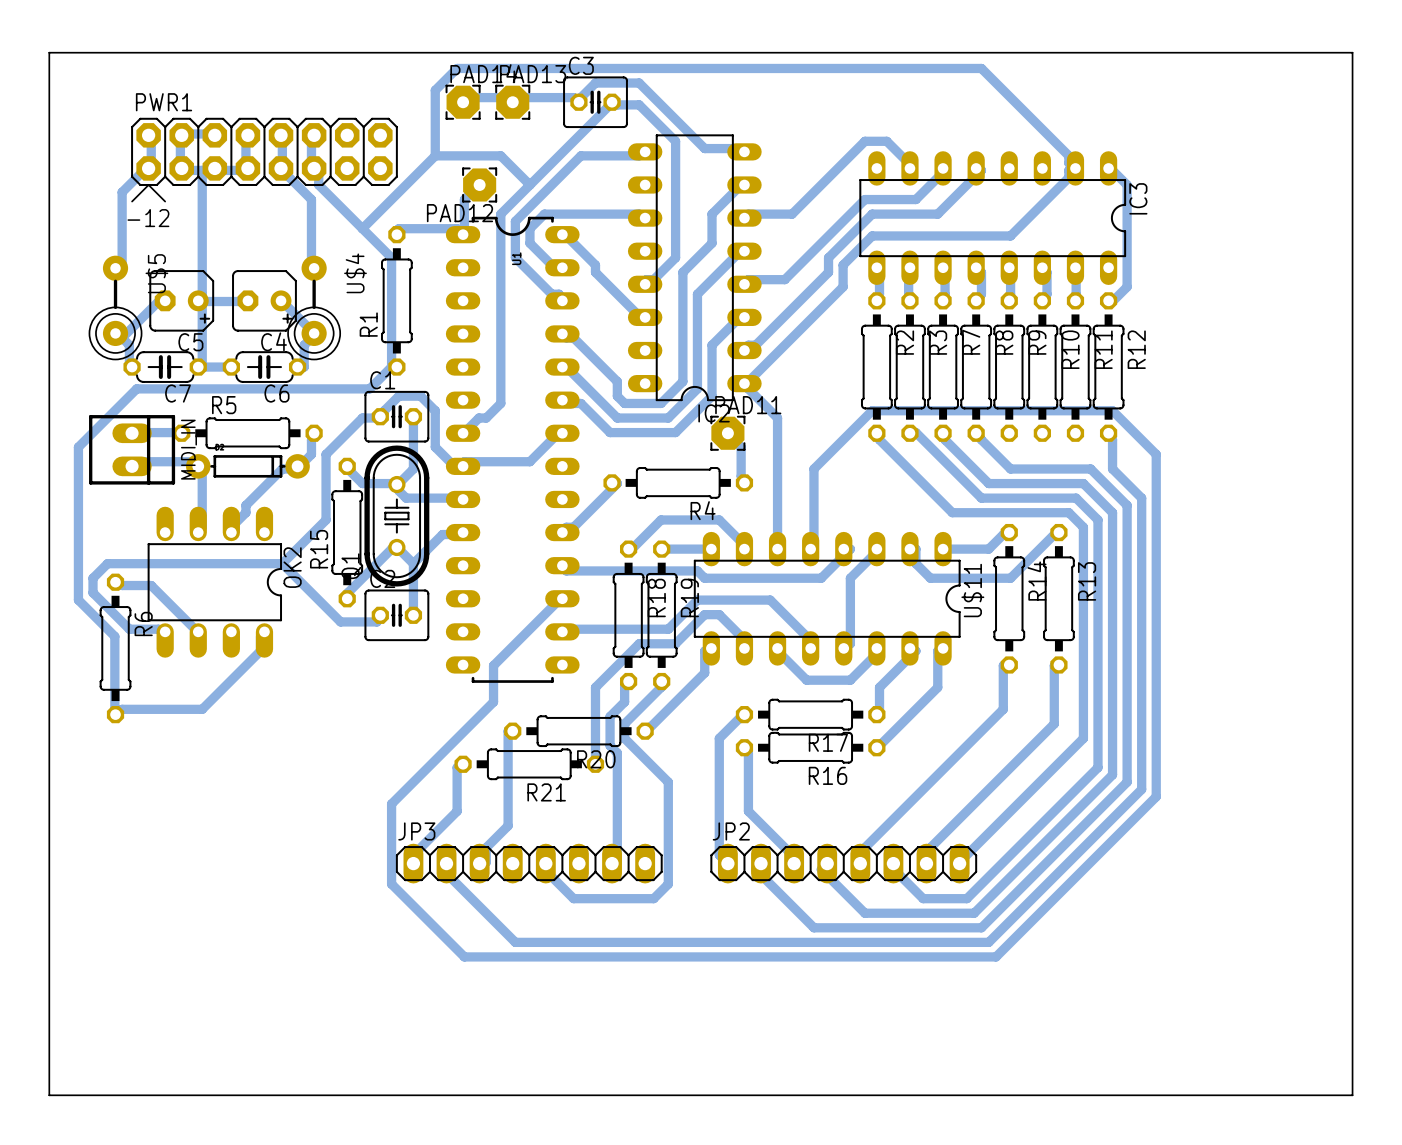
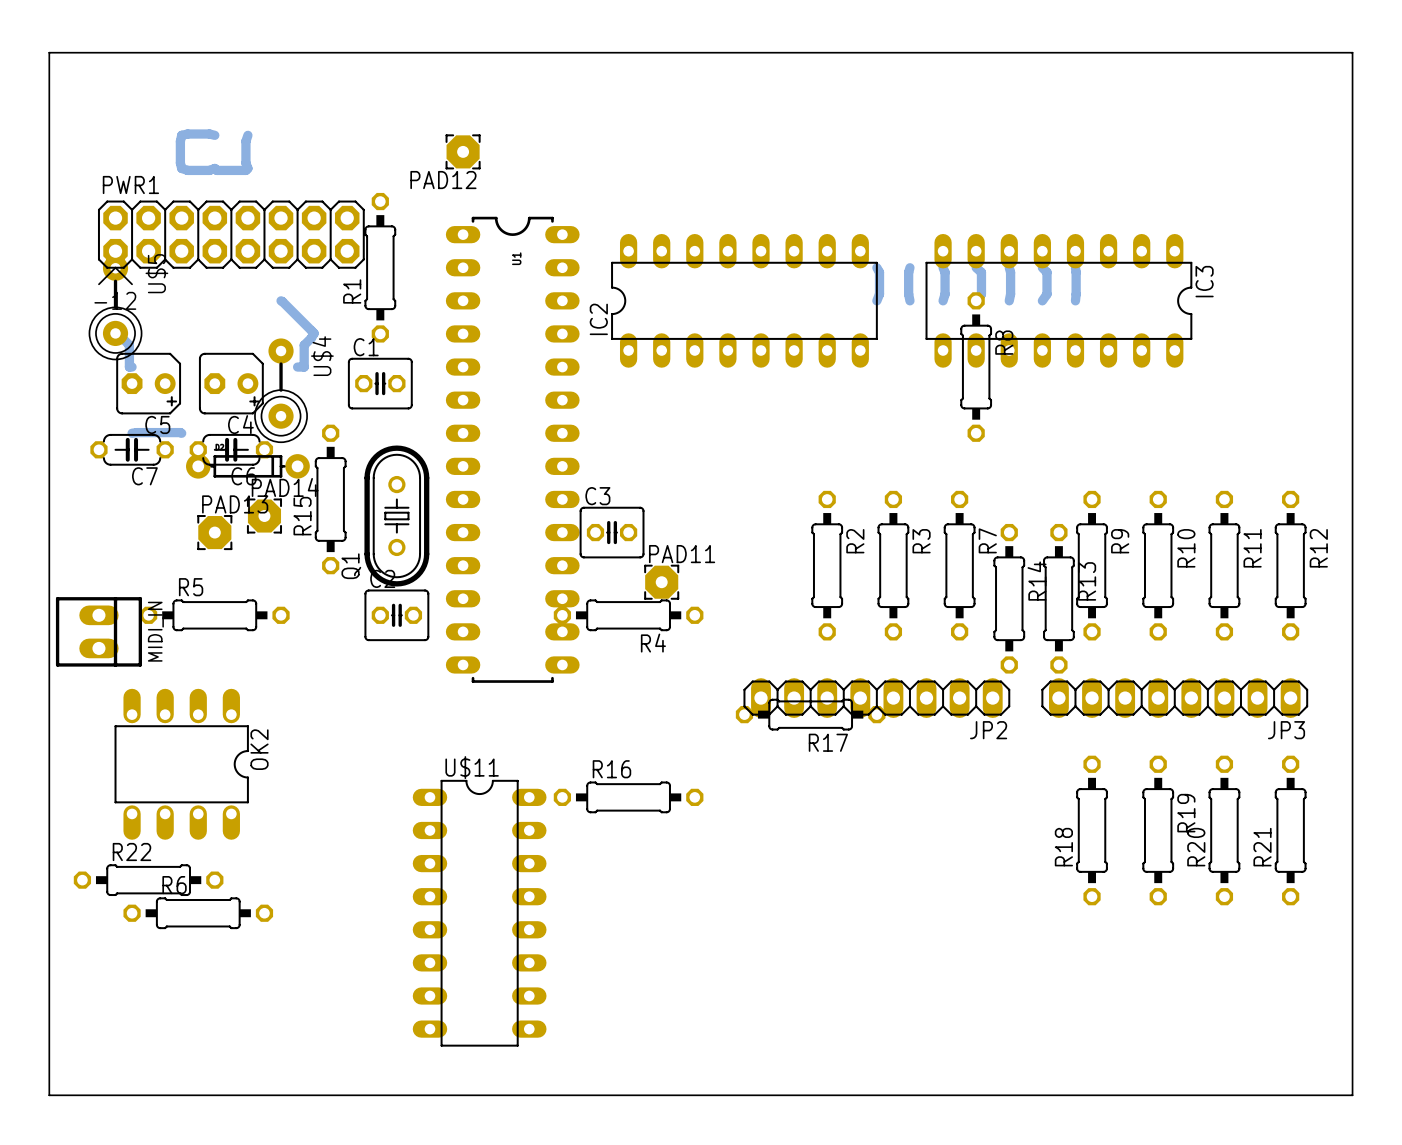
bottom track: (463, 102) (464, 97) (508, 97) (512, 102) (515, 97) (573, 97) (578, 102) (580, 97) (595, 83) (639, 83) (704, 148) (741, 148) (744, 151) -> none
PAD14 position: (463, 102) -> (264, 516)
PAD13 position: (512, 102) -> (214, 532)
C3 position: (595, 102) -> (612, 532)
bottom track: (148, 135) (151, 141) (151, 163) (148, 168) (143, 170) (122, 192) (122, 265) (115, 268) -> none
bottom track: (281, 135) (281, 168) (311, 199) (311, 265) (314, 268) -> none
bottom track: (314, 135) (311, 141) (311, 163) (314, 168) (318, 170) (318, 184) (391, 257) (391, 367) -> none
bottom track: (645, 151) (639, 155) (580, 155) (515, 221) (515, 257) (551, 294) (559, 294) (562, 300) -> none
bottom track: (435, 155) (500, 155) (529, 184) -> none
bottom track: (435, 155) (362, 228) -> none
bottom track: (435, 155) (435, 90) (457, 68) (981, 68) (1068, 155) (1068, 163) (1075, 168) (1068, 170) (1068, 177) (1010, 235) (872, 235) (843, 265) (843, 286) (744, 383) (777, 418) (777, 549) -> none
PWR1 position: (264, 160) -> (231, 242)
bottom track: (909, 168) (908, 163) (886, 141) (864, 141) (792, 214) (748, 214) (744, 218) -> none
bottom track: (943, 168) (945, 170) (915, 199) (864, 199) (784, 279) (748, 279) (744, 284) -> none
bottom track: (976, 168) (981, 170) (937, 214) (872, 214) (828, 257) (828, 272) (755, 345) (748, 345) (744, 350) -> none
bottom track: (1108, 168) (1127, 184) (1127, 286) (1112, 301) (1108, 300) -> none
bottom track: (202, 170) (202, 294) (198, 300) (202, 301) -> none
bottom track: (479, 184) (464, 199) (463, 234) (457, 228) (398, 228) (396, 234) -> none
PAD12 position: (479, 184) -> (463, 151)
bottom track: (744, 184) (741, 184) (712, 214) (712, 243) (682, 272) (682, 381) (661, 403) (624, 403) (617, 396) (617, 381) (573, 337) (566, 337) (562, 333) -> none
bottom track: (645, 218) (639, 214) (544, 214) (529, 228) (529, 243) (551, 265) (559, 265) (562, 267) -> none
IC3 position: (992, 218) -> (1058, 300)
bottom track: (562, 234) (566, 235) (595, 265) (595, 272) (639, 316) (645, 317) -> none
bottom track: (744, 251) (741, 250) (697, 294) (697, 388) (668, 418) (617, 418) (566, 367) (562, 367) -> none
IC2 rotation: 0° (694, 267) -> 90° clockwise (744, 300)
bottom track: (645, 284) (646, 279) (653, 279) (675, 257) (675, 141) (639, 104) (617, 104) (612, 102) (500, 214) (500, 403) (486, 418) (478, 418) (463, 433) -> none
bottom track: (165, 300) (158, 301) (122, 337) (115, 333) -> none
C5 position: (181, 300) -> (148, 383)
bottom track: (247, 300) (202, 301) -> none
C4 position: (264, 300) -> (231, 383)
R1 position: (396, 300) -> (380, 267)
bottom track: (202, 301) (202, 367) -> none
U$4 position: (314, 308) -> (281, 390)
bottom track: (744, 317) (741, 316) (712, 345) (712, 396) (675, 432) (610, 432) (580, 403) (566, 403) (562, 400) -> none
C7 position: (165, 367) -> (132, 449)
bottom track: (198, 367) (231, 367) -> none
C6 position: (264, 367) -> (231, 449)
bottom track: (391, 367) (369, 388) (136, 388) (78, 447) (78, 600) (114, 636) (115, 714) (122, 709) (202, 709) (260, 651) (260, 636) (264, 631) -> none
R2 position: (876, 367) -> (827, 565)
R3 position: (909, 367) -> (893, 565)
R7 position: (943, 367) -> (959, 565)
R9 position: (1009, 367) -> (1092, 565)
R10 position: (1042, 367) -> (1158, 565)
R11 position: (1075, 367) -> (1224, 565)
R12 position: (1108, 367) -> (1290, 565)
C1 position: (396, 416) -> (380, 383)
bottom track: (413, 416) (413, 469) (396, 484) -> none
R5 position: (247, 433) -> (214, 615)
bottom track: (314, 433) (311, 439) (311, 454) (296, 469) (282, 469) (245, 505) (245, 512) (231, 527) (231, 532) -> none
bottom track: (562, 433) (559, 432) (529, 461) (464, 461) (463, 466) (457, 469) (435, 447) (435, 410) (420, 396) (398, 396) (380, 416) (362, 418) (326, 454) (326, 519) (282, 563) -> none
bottom track: (727, 433) (741, 447) (741, 476) (744, 482) -> none
PAD11 position: (727, 433) -> (661, 582)
bottom track: (876, 433) (879, 439) (952, 512) (1068, 512) (1083, 527) (1083, 738) (959, 863) -> none
bottom track: (909, 433) (915, 432) (981, 498) (1076, 498) (1097, 519) (1097, 767) (966, 898) (923, 898) (894, 869) (893, 863) -> none
bottom track: (943, 433) (945, 439) (988, 483) (1083, 483) (1112, 512) (1112, 774) (974, 913) (864, 913) (821, 869) (827, 863) -> none
bottom track: (976, 433) (1010, 469) (1090, 469) (1127, 505) (1127, 782) (981, 927) (813, 927) (755, 869) (761, 863) -> none
bottom track: (1108, 433) (1112, 439) (1112, 469) (1141, 498) (1141, 789) (988, 942) (515, 942) (442, 869) (446, 863) -> none
MIDI_IN position: (132, 449) -> (98, 631)
bottom track: (132, 466) (136, 461) (194, 461) (202, 469) (202, 527) (198, 532) -> none
bottom track: (347, 466) (362, 483) (396, 484) -> none
bottom track: (612, 482) (617, 483) (573, 527) (566, 527) (562, 532) -> none
R4 position: (678, 482) -> (628, 615)
bottom track: (396, 484) (398, 490) (406, 498) (463, 499) -> none
R15 position: (347, 532) -> (330, 499)
bottom track: (463, 532) (442, 534) (413, 563) -> none
bottom track: (1009, 532) (1003, 534) (988, 549) (943, 549) -> none
bottom track: (1058, 532) (1054, 534) (1010, 578) (930, 578) (915, 563) (915, 549) (909, 549) -> none
bottom track: (628, 549) (631, 549) (661, 519) (719, 519) (748, 549) (744, 549) -> none
bottom track: (661, 549) (711, 549) -> none
bottom track: (810, 549) (813, 549) (813, 469) (872, 410) (1112, 410) (1156, 454) (1156, 796) (996, 956) (464, 956) (391, 884) (391, 804) (493, 702) (493, 665) (562, 598) -> none
bottom track: (843, 549) (850, 549) (821, 578) (704, 578) (697, 570) (566, 570) (562, 565) -> none
bottom track: (876, 549) (879, 549) (850, 578) (850, 643) (843, 648) -> none
bottom track: (282, 563) (107, 563) (93, 578) (93, 592) (129, 629) (158, 629) (165, 631) -> none
bottom track: (282, 563) (340, 621) (377, 621) (380, 615) -> none
bottom track: (413, 563) (413, 615) -> none
bottom track: (413, 563) (396, 547) (391, 549) (347, 592) (347, 598) -> none
bottom track: (115, 582) (122, 585) (151, 585) (198, 631) -> none
OK2 position: (214, 582) -> (181, 764)
R18 name position: R18 (656, 597) -> R18 (1063, 847)
U$11 rotation: 0° (827, 598) -> 90° counterclockwise (479, 913)
U$11 position: (827, 598) -> (479, 913)
R18 position: (628, 615) -> (1092, 830)
R19 position: (661, 615) -> (1158, 830)
R6 name position: R6 (143, 623) -> R6 (174, 885)
bottom track: (562, 631) (566, 629) (668, 629) (697, 600) (770, 600) (813, 643) (810, 648) -> none
R6 rotation: 0° (115, 648) -> 90° clockwise (198, 913)
R6 position: (115, 648) -> (198, 913)
bottom track: (711, 648) (704, 651) (704, 672) (645, 731) -> none
bottom track: (744, 648) (748, 643) (719, 614) (704, 614) (675, 643) (639, 643) (595, 687) (595, 764) -> none
bottom track: (777, 648) (777, 651) (806, 680) (850, 680) (879, 651) (876, 648) -> none
bottom track: (909, 648) (915, 651) (879, 687) (879, 709) (876, 714) -> none
bottom track: (943, 648) (937, 651) (937, 687) (876, 747) -> none
bottom track: (1009, 664) (1003, 665) (1003, 709) (864, 847) (864, 862) (860, 863) -> none
bottom track: (1058, 664) (1054, 665) (1054, 723) (930, 847) (930, 862) (926, 863) -> none
bottom track: (628, 681) (624, 687) (624, 702) (610, 716) (610, 745) (617, 753) (617, 862) (612, 863) -> none
bottom track: (661, 681) (661, 687) (624, 723) (624, 738) (668, 782) (668, 884) (653, 898) (573, 898) (544, 869) (545, 863) -> none
bottom track: (744, 714) (719, 738) (719, 854) (727, 863) -> none
bottom track: (512, 731) (508, 731) (508, 825) (486, 847) (486, 862) (479, 863) -> none
R20 rotation: 0° (578, 731) -> 90° clockwise (1224, 830)
R20 position: (578, 731) -> (1224, 830)
bottom track: (744, 747) (748, 753) (748, 811) (799, 862) (794, 863) -> none
R16 position: (810, 747) -> (628, 797)
bottom track: (463, 764) (457, 767) (457, 811) (413, 854) (413, 863) -> none
R21 rotation: 0° (529, 764) -> 90° clockwise (1290, 830)
R21 position: (529, 764) -> (1290, 830)
R16 name position: R16 (828, 775) -> R16 (611, 769)
JP3 name position: JP3 (416, 831) -> JP3 (1286, 730)
JP2 name position: JP2 (731, 831) -> JP2 (988, 730)
JP3 position: (529, 863) -> (1174, 698)
JP2 position: (843, 863) -> (876, 698)
R22: none -> (148, 880)

